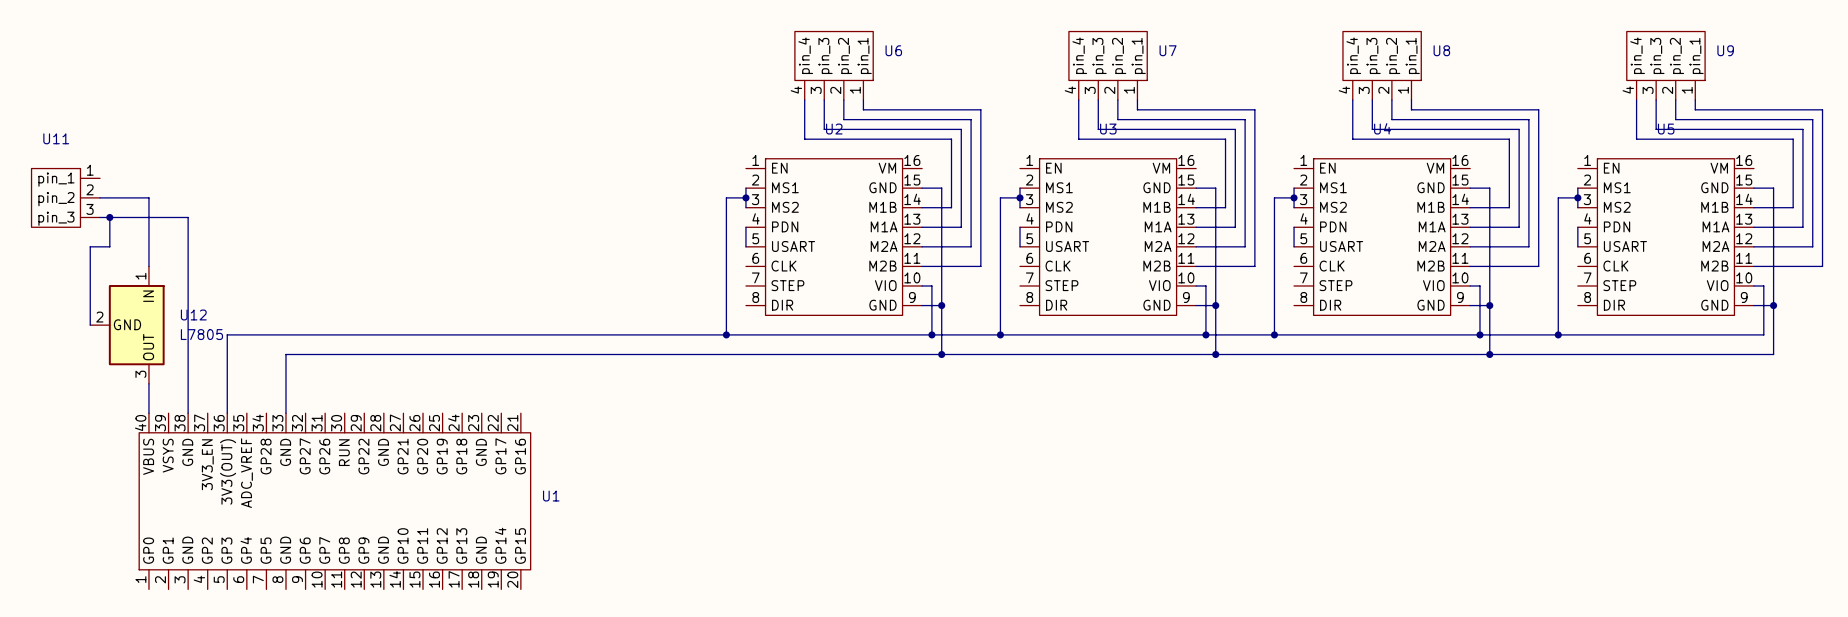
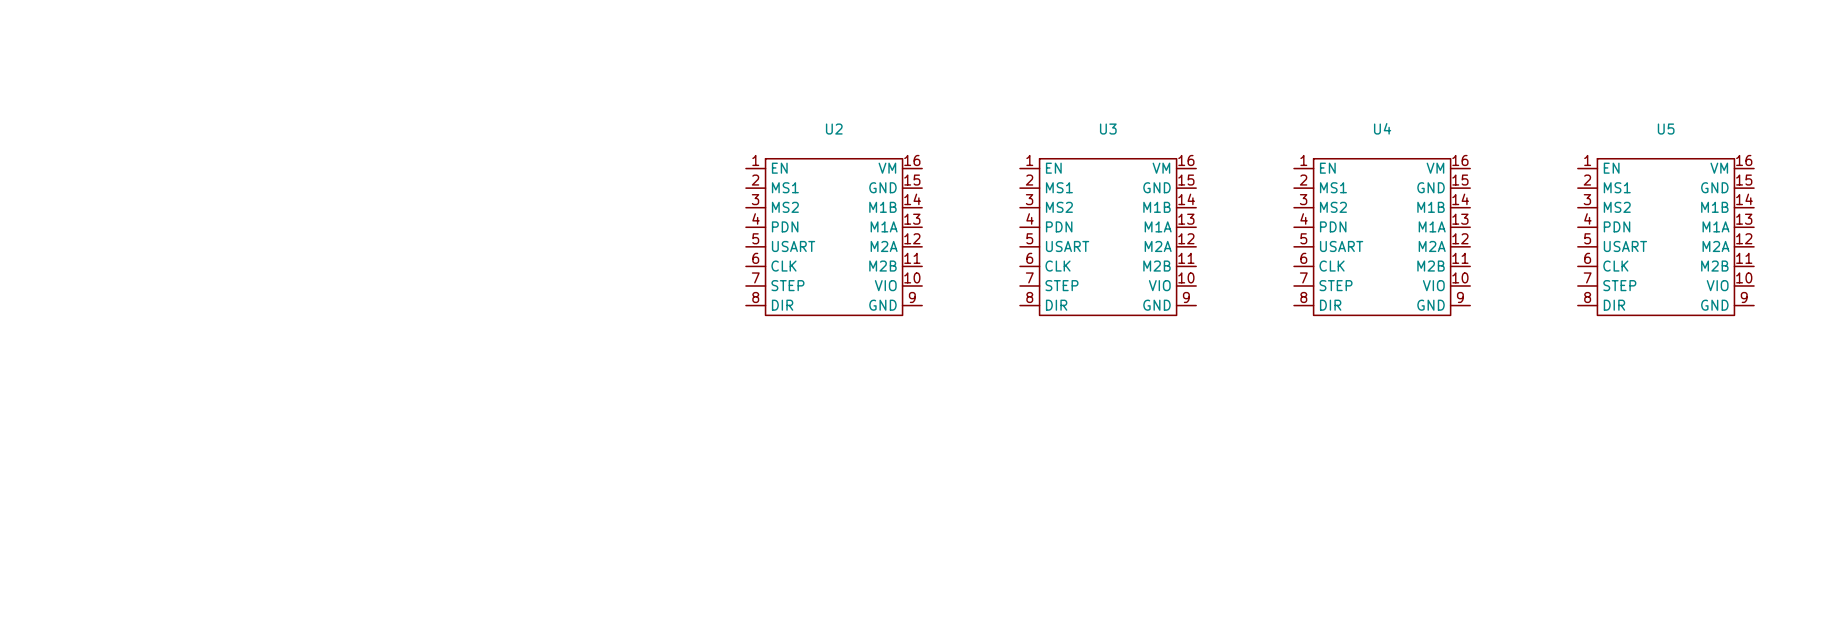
U6: (834, 65) -> none
U7: (1108, 65) -> none
U8: (1382, 65) -> none
U9: (1665, 65) -> none
wire: (804, 100) (804, 139) (951, 139) (951, 207) (922, 207) -> none
wire: (824, 100) (824, 129) (961, 129) (961, 227) (922, 227) -> none
wire: (843, 100) (843, 119) (971, 119) (971, 246) (922, 246) -> none
wire: (863, 100) (863, 109) (980, 109) (980, 266) (922, 266) -> none
wire: (1078, 100) (1078, 139) (1225, 139) (1225, 207) (1196, 207) -> none
wire: (1098, 100) (1098, 129) (1235, 129) (1235, 227) (1196, 227) -> none
wire: (1117, 100) (1117, 119) (1245, 119) (1245, 246) (1196, 246) -> none
wire: (1137, 100) (1137, 109) (1254, 109) (1254, 266) (1196, 266) -> none
wire: (1352, 100) (1352, 139) (1509, 139) (1509, 207) (1470, 207) -> none
wire: (1372, 100) (1372, 129) (1519, 129) (1519, 227) (1470, 227) -> none
wire: (1391, 100) (1391, 119) (1528, 119) (1528, 246) (1470, 246) -> none
wire: (1411, 100) (1411, 109) (1538, 109) (1538, 266) (1470, 266) -> none
wire: (1636, 100) (1636, 139) (1793, 139) (1793, 207) (1754, 207) -> none
wire: (1656, 100) (1656, 129) (1802, 129) (1802, 227) (1754, 227) -> none
wire: (1675, 100) (1675, 119) (1812, 119) (1812, 246) (1754, 246) -> none
wire: (1695, 100) (1695, 109) (1822, 109) (1822, 266) (1754, 266) -> none
wire: (745, 188) (745, 207) -> none
wire: (922, 188) (941, 188) (941, 354) -> none
wire: (1020, 188) (1020, 207) -> none
wire: (1196, 188) (1215, 188) (1215, 354) -> none
wire: (1294, 188) (1294, 207) -> none
wire: (1470, 188) (1489, 188) (1489, 354) -> none
wire: (1577, 188) (1577, 207) -> none
wire: (1754, 188) (1773, 188) (1773, 354) (285, 354) (285, 413) -> none
U11: (65, 197) -> none
wire: (100, 197) (148, 197) (148, 266) -> none
wire: (745, 197) (726, 197) (726, 334) -> none
junction: (745, 197) -> none
wire: (1020, 197) (1000, 197) (1000, 334) -> none
junction: (1020, 197) -> none
wire: (1294, 197) (1274, 197) (1274, 334) -> none
junction: (1294, 197) -> none
wire: (1577, 197) (1558, 197) (1558, 334) -> none
junction: (1577, 197) -> none
wire: (100, 217) (188, 217) (188, 413) -> none
wire: (109, 217) (109, 246) (90, 246) (90, 325) -> none
junction: (109, 217) -> none
wire: (745, 227) (745, 246) -> none
wire: (1020, 227) (1020, 246) -> none
wire: (1294, 227) (1294, 246) -> none
wire: (1577, 227) (1577, 246) -> none
wire: (922, 285) (931, 285) (931, 334) -> none
wire: (1196, 285) (1205, 285) (1205, 334) -> none
wire: (1470, 285) (1479, 285) (1479, 334) -> none
wire: (1754, 285) (1763, 285) (1763, 334) (227, 334) (227, 413) -> none
wire: (922, 305) (941, 305) -> none
junction: (941, 305) -> none
wire: (1196, 305) (1215, 305) -> none
junction: (1215, 305) -> none
wire: (1470, 305) (1489, 305) -> none
junction: (1489, 305) -> none
wire: (1754, 305) (1773, 305) -> none
junction: (1773, 305) -> none
U12: L7805 (127, 325) -> none
junction: (726, 334) -> none
junction: (931, 334) -> none
junction: (1000, 334) -> none
junction: (1205, 334) -> none
junction: (1274, 334) -> none
junction: (1479, 334) -> none
junction: (1558, 334) -> none
junction: (941, 354) -> none
junction: (1215, 354) -> none
junction: (1489, 354) -> none
wire: (148, 383) (148, 413) -> none
U1: (334, 501) -> none

